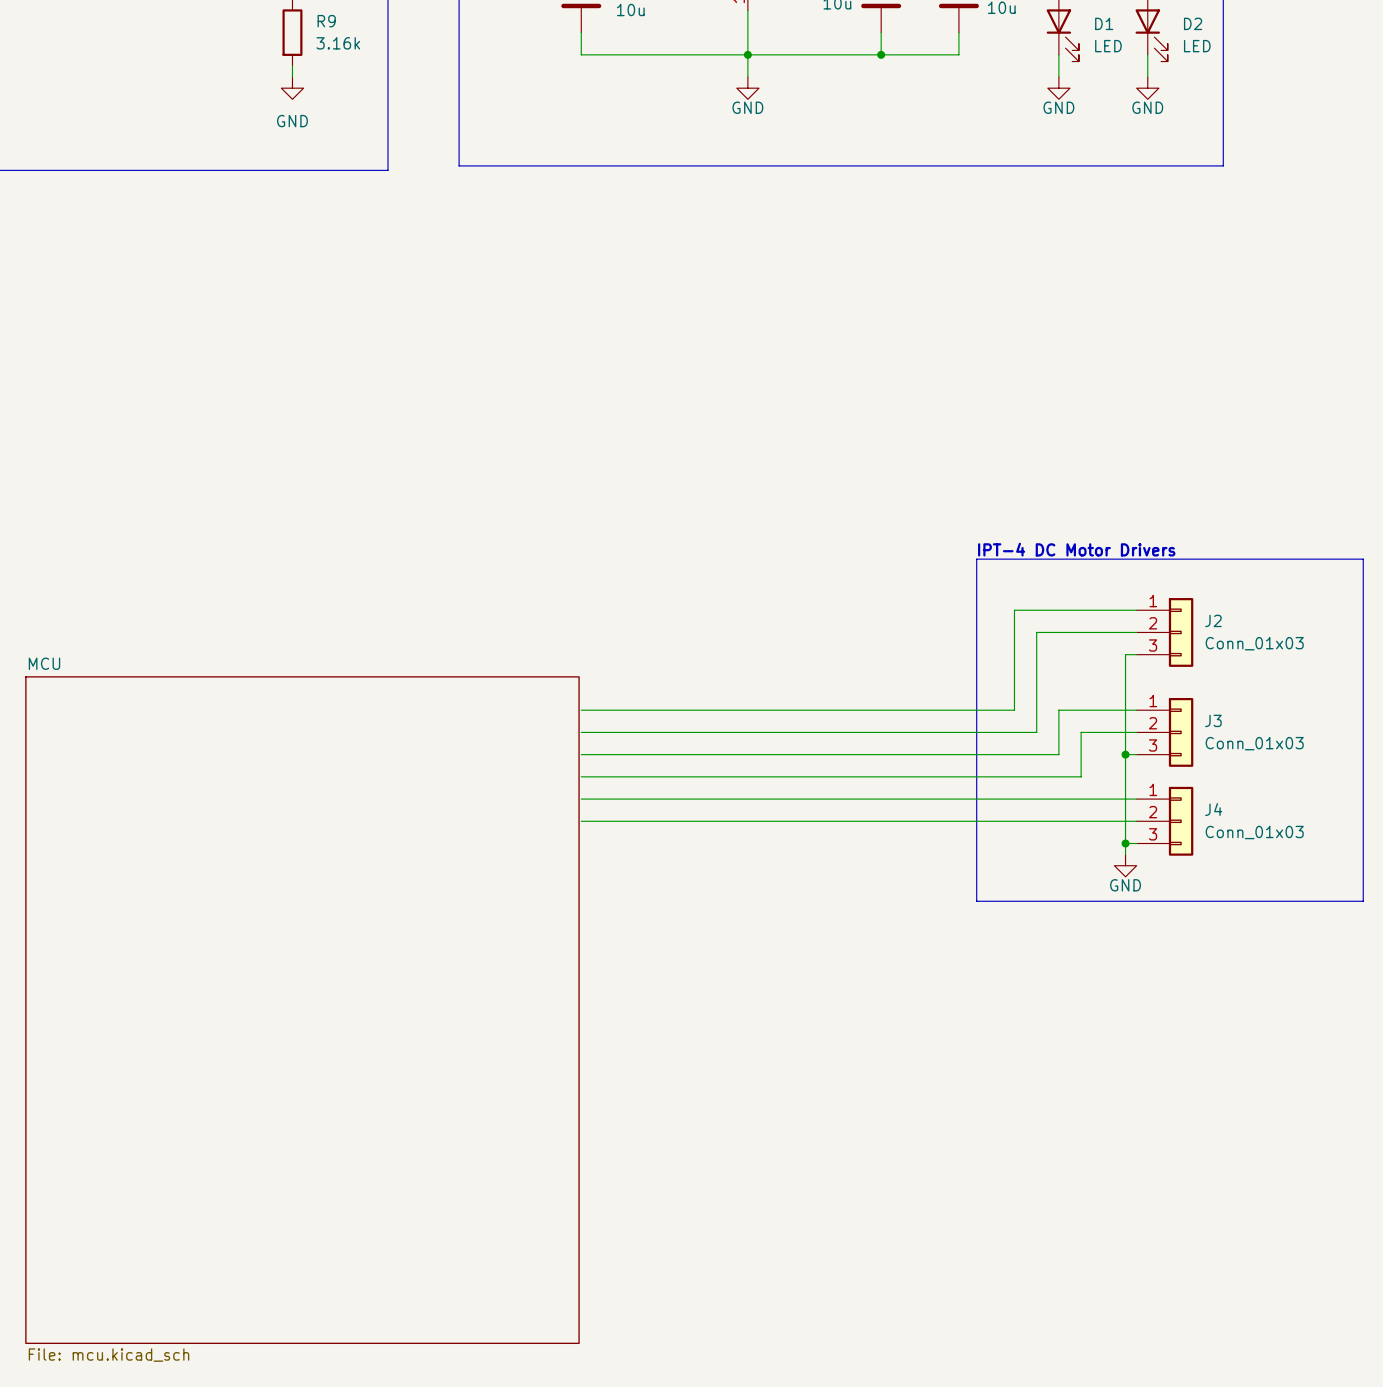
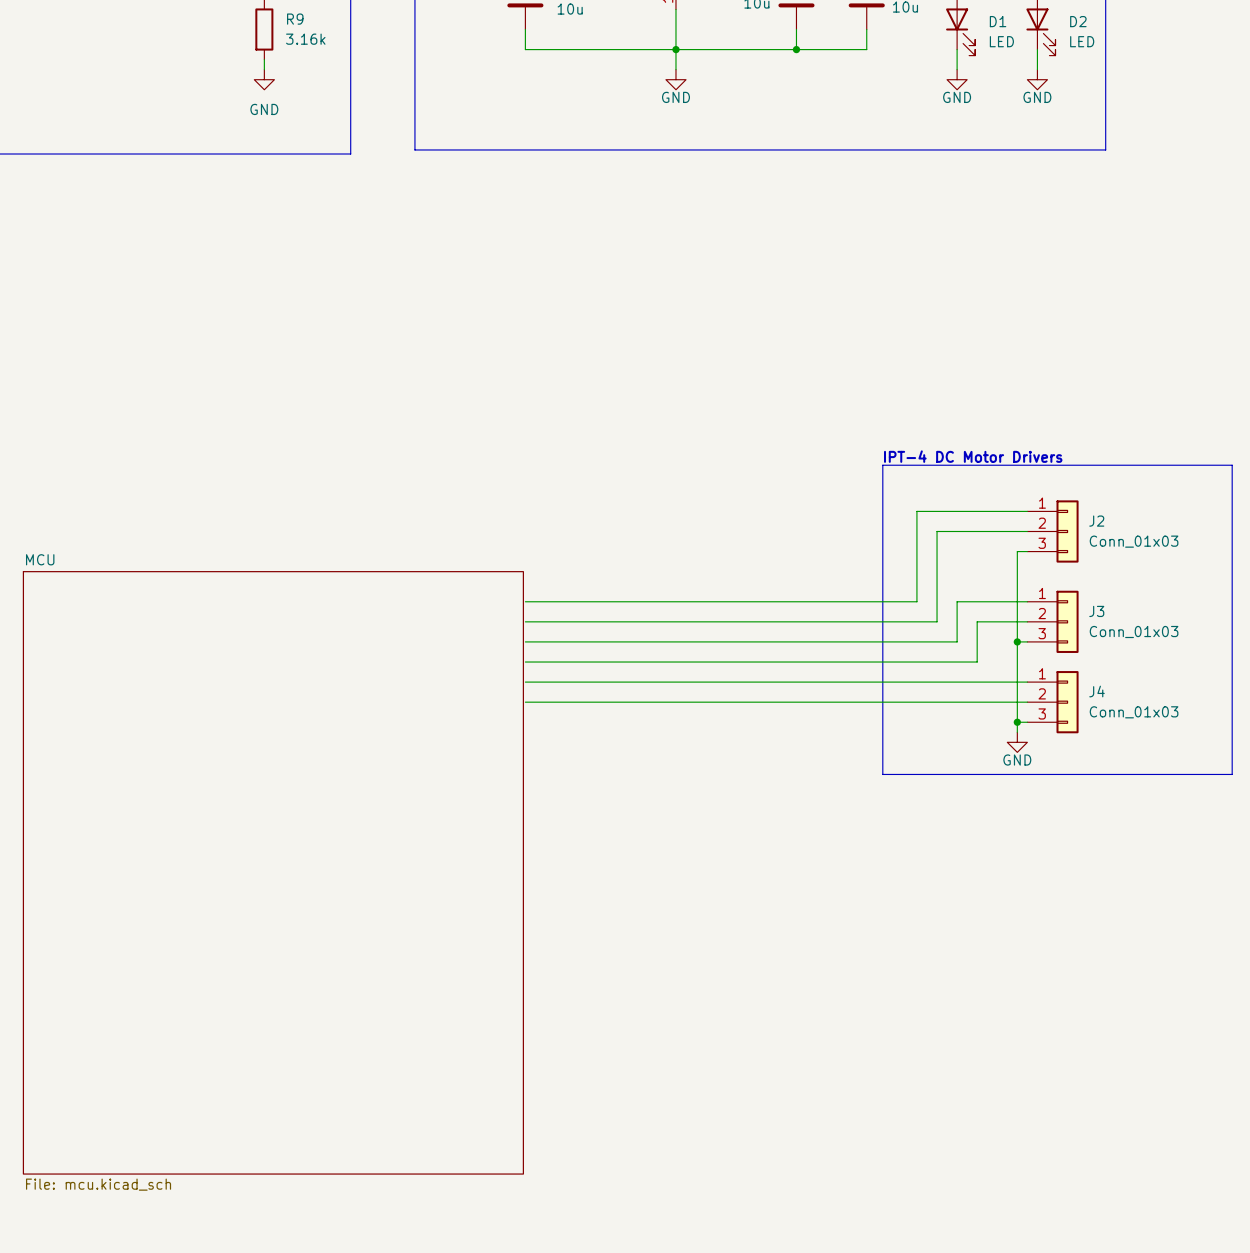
text position: IPT-4 DC Motor Drivers (1076, 549) -> IPT-4 DC Motor Drivers (973, 456)
line: (976, 559) (1363, 559) -> (882, 505) (882, 465) (1232, 465) (1232, 505)
wire: (1014, 610) (1125, 610) -> (916, 551) (916, 511) (1027, 511)
wire: (1036, 632) (1136, 632) -> (937, 571) (937, 531) (1027, 531)
J2 position: (1164, 632) -> (1052, 531)
wire: (1125, 654) (1136, 654) -> (1017, 591) (1017, 551)
wire: none -> (525, 601) (916, 601)
wire: (1014, 665) (1014, 710) -> (1027, 601) (957, 601) (957, 641) (916, 641)
wire: none -> (525, 621) (937, 621)
wire: (1036, 687) (1036, 732) -> (1027, 621) (977, 621) (977, 662) (937, 662)
wire: (1125, 710) (1058, 710) (1058, 754) -> (1017, 682) (957, 682)
junction: none -> (1017, 641)
wire: (1136, 732) (1081, 732) (1081, 776) -> (1027, 702) (977, 702)
J3 position: (1164, 732) -> (1052, 621)
junction: (1125, 754) -> none
wire: (581, 799) (1125, 799) -> none
junction: none -> (1017, 722)
wire: (1125, 810) (1125, 854) -> none
wire: (581, 821) (1136, 821) -> none
J4 position: (1164, 821) -> (1052, 702)
wire: (1125, 843) (1136, 843) -> none
junction: (1125, 843) -> none
line: (976, 856) (976, 901) (1363, 901) (1363, 856) -> (882, 774) (1232, 774)
power symbol position: GND (1125, 865) -> GND (1017, 742)
sheet MCU position: (302, 1010) -> (273, 872)

